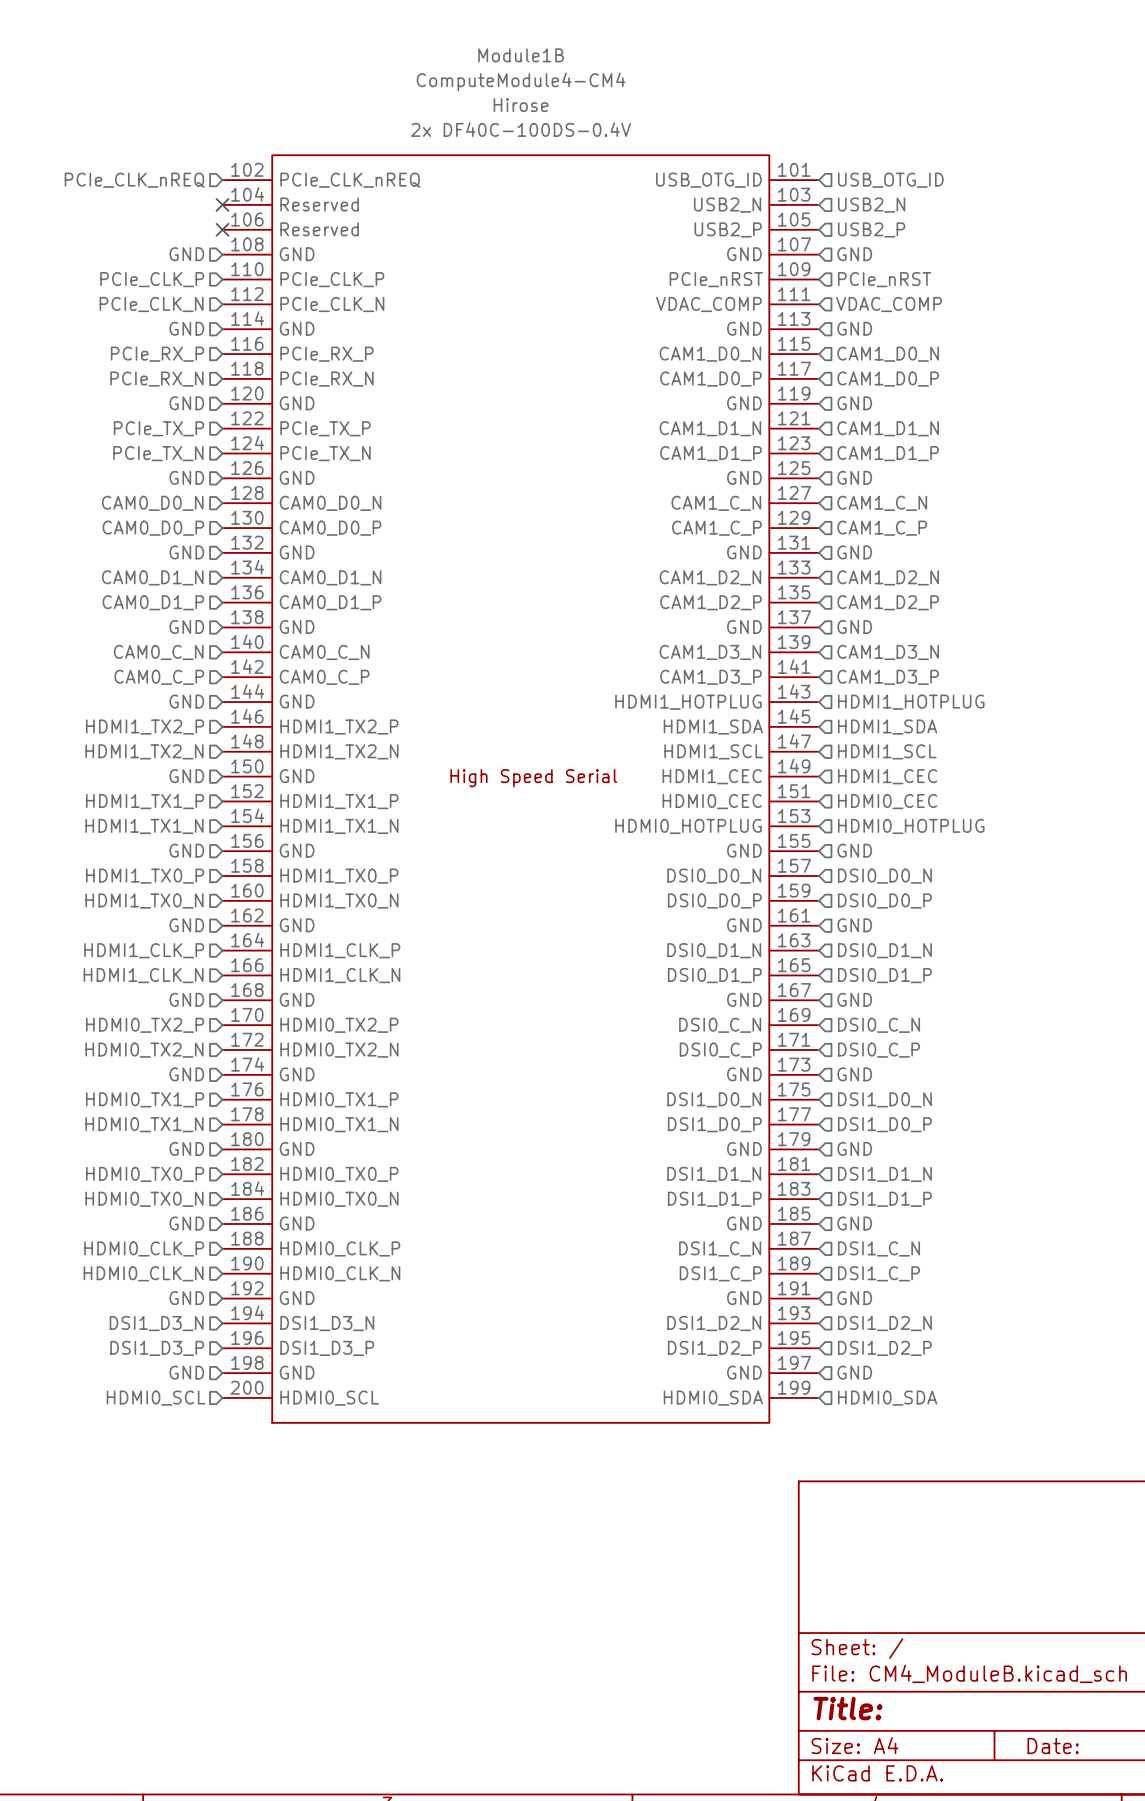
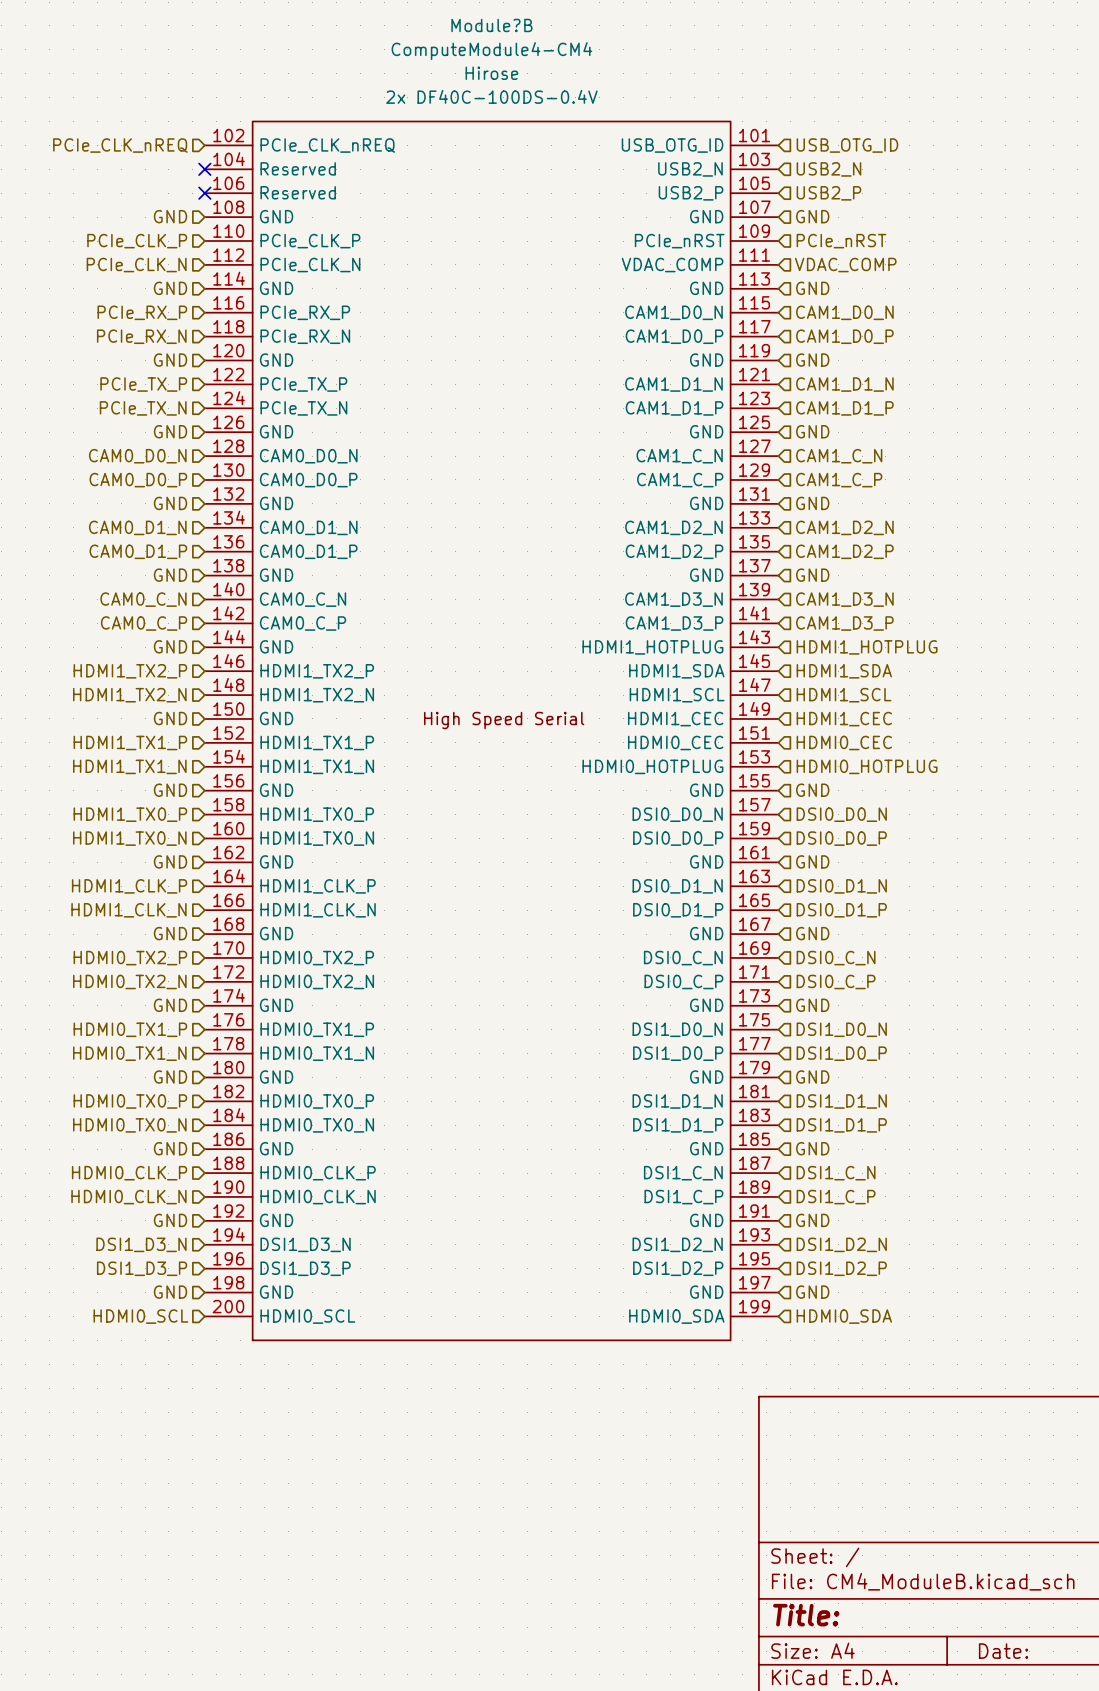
Module1B name: Module1B (521, 55) -> Module?B (491, 25)

